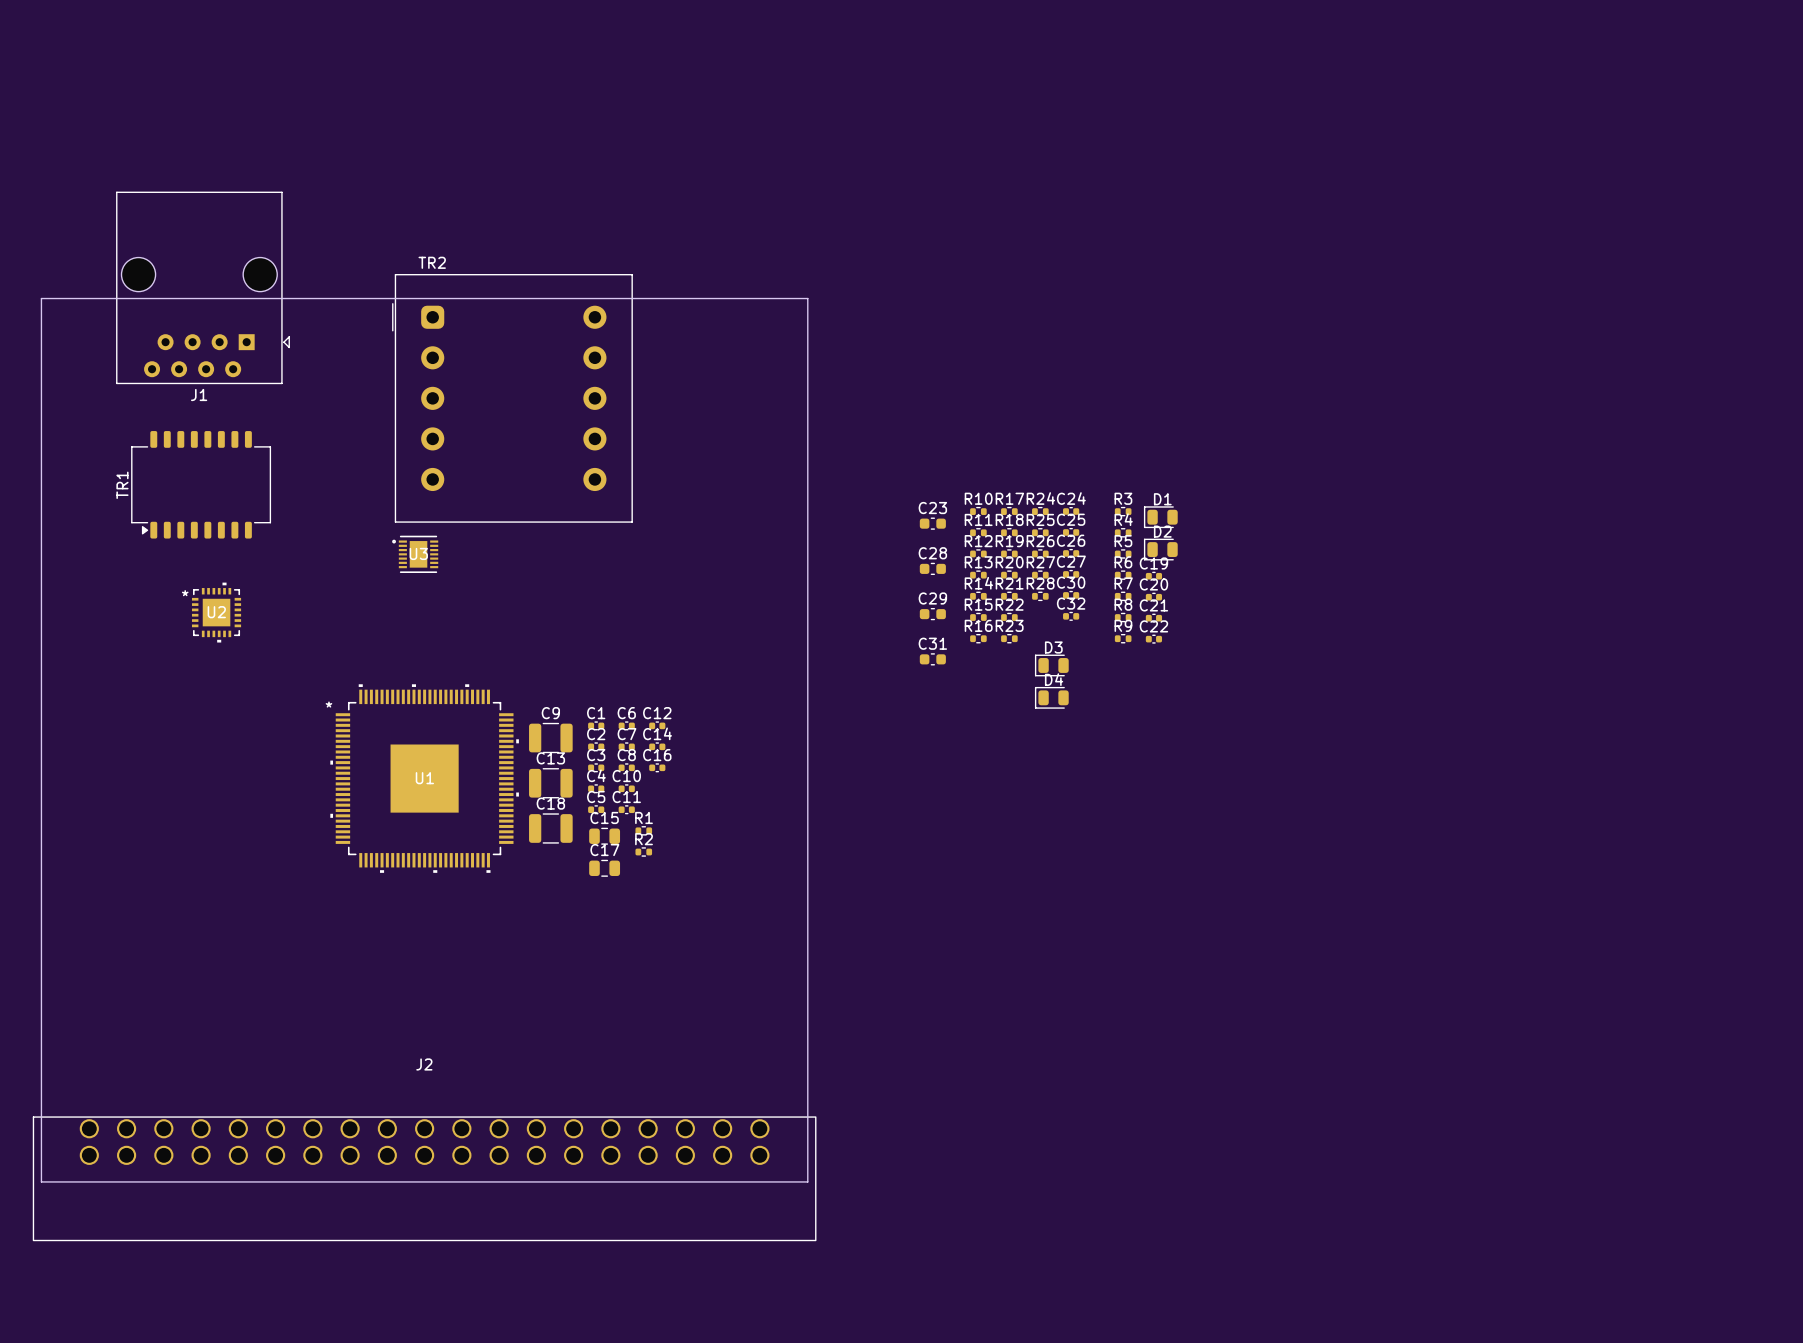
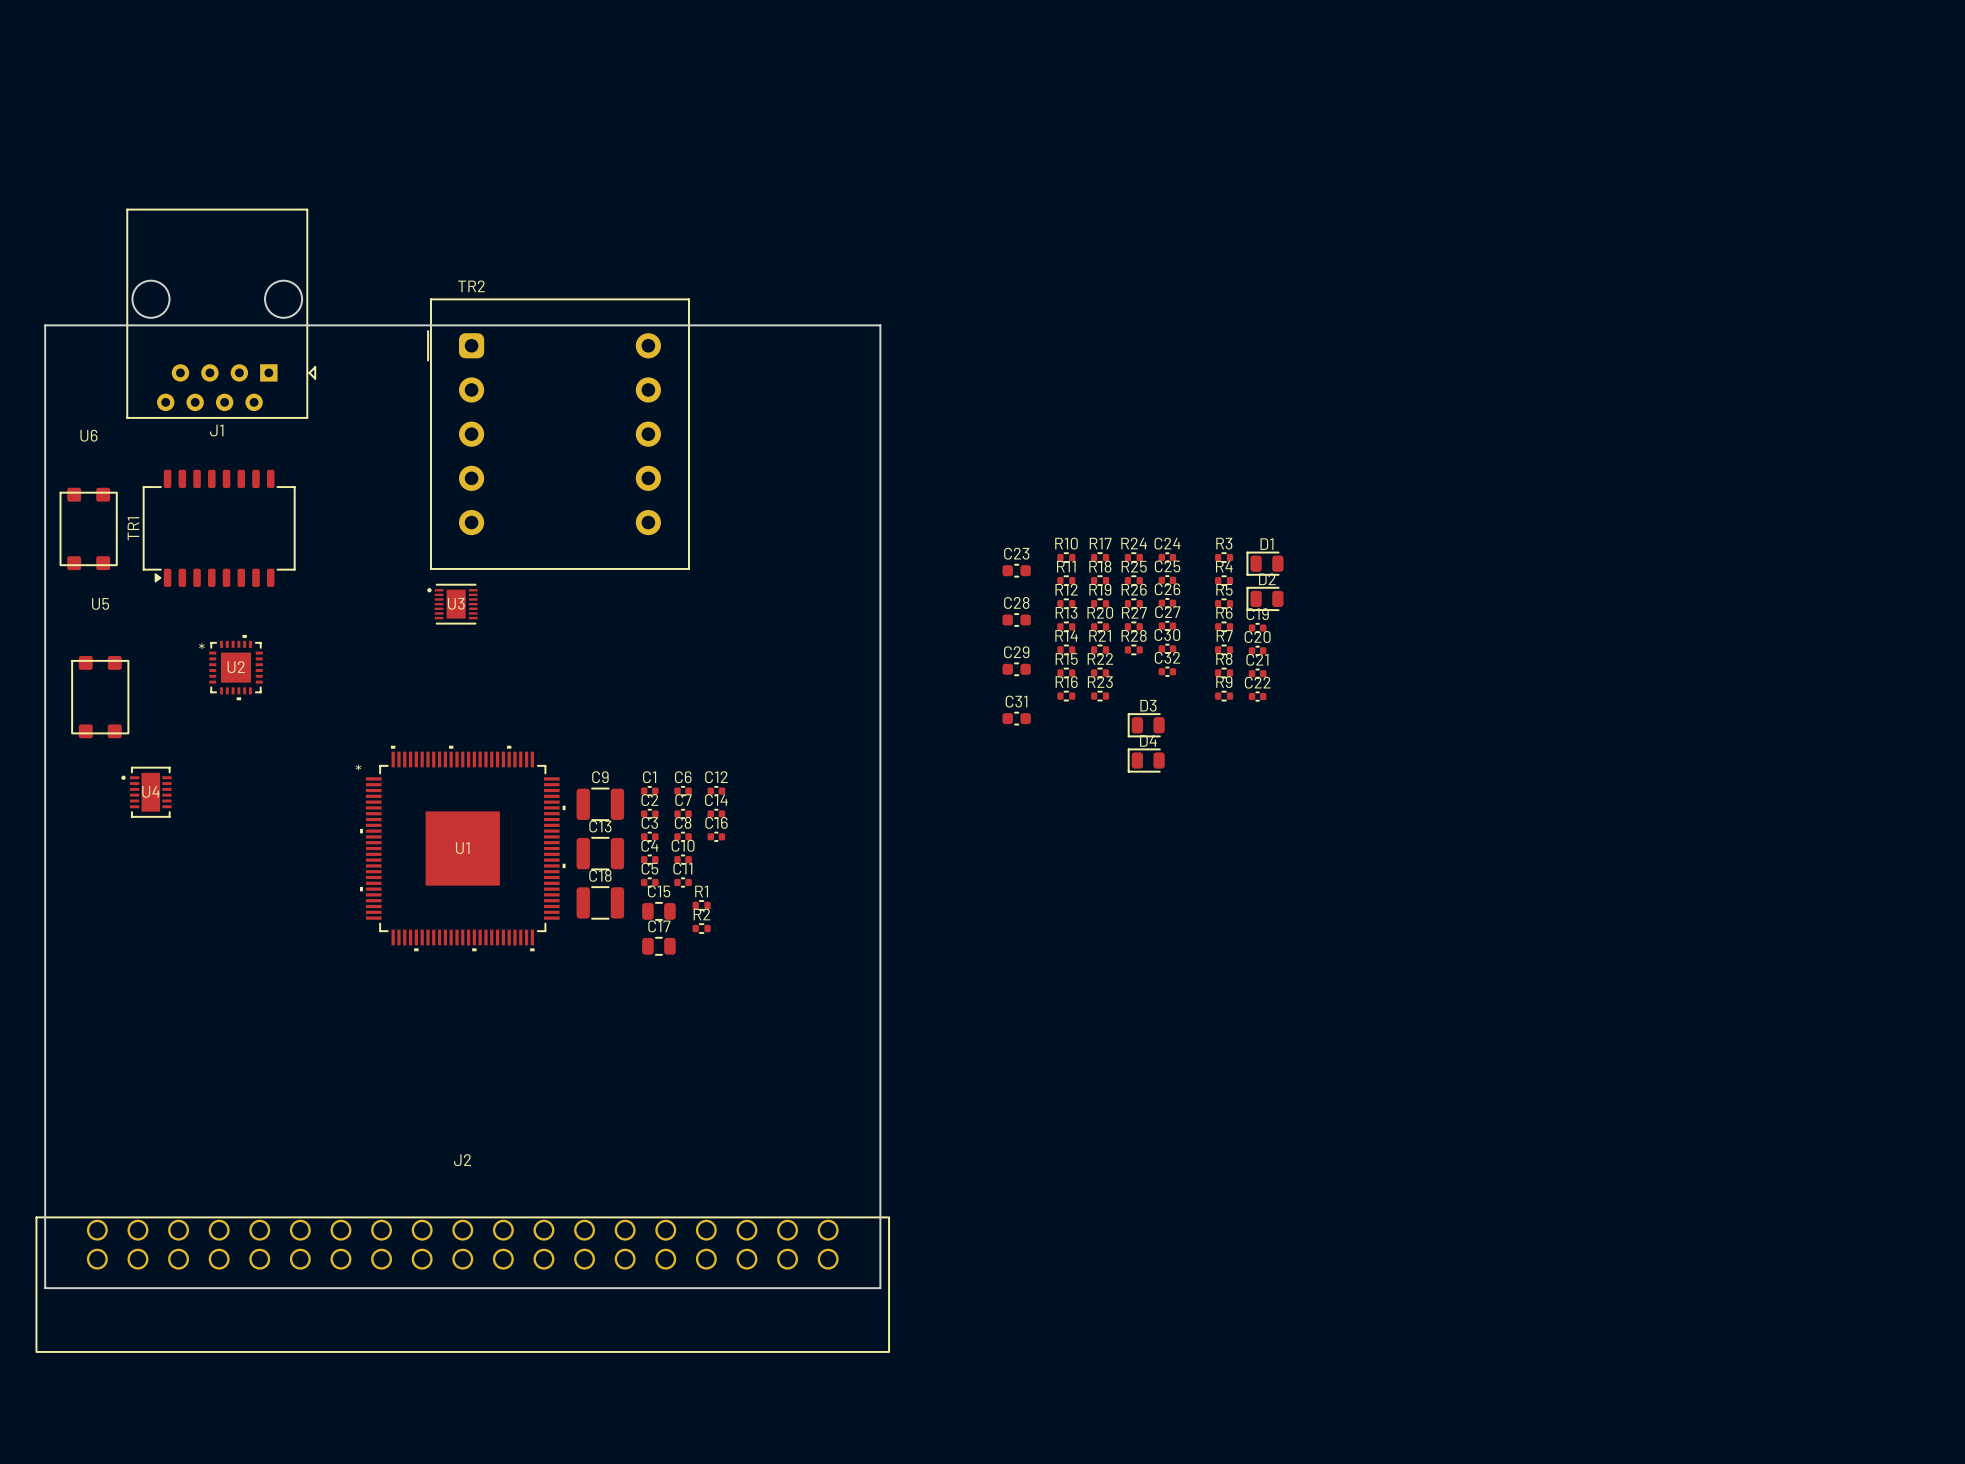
U6: none -> (88, 528)
U5: none -> (100, 697)
U4: none -> (146, 792)

